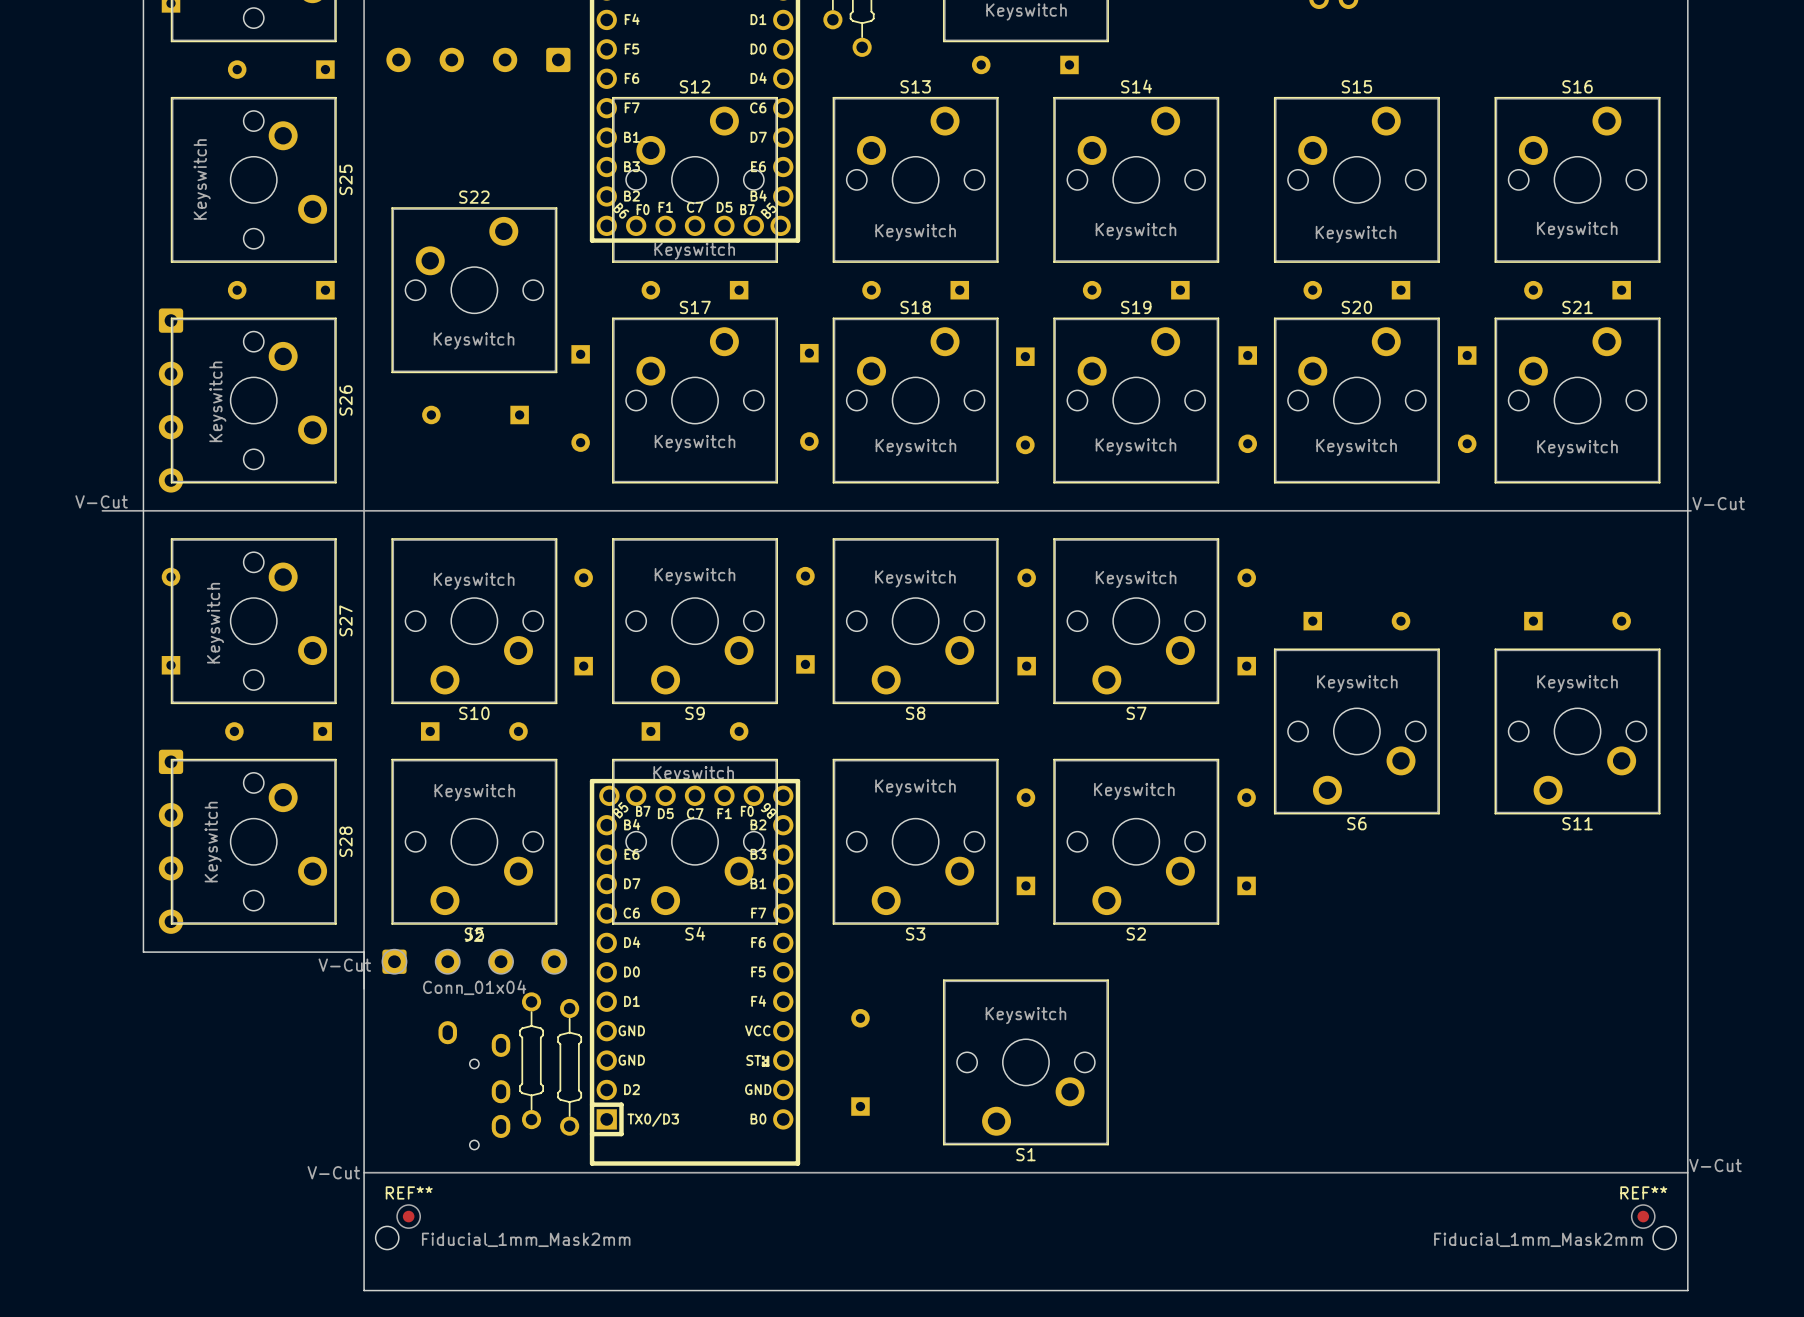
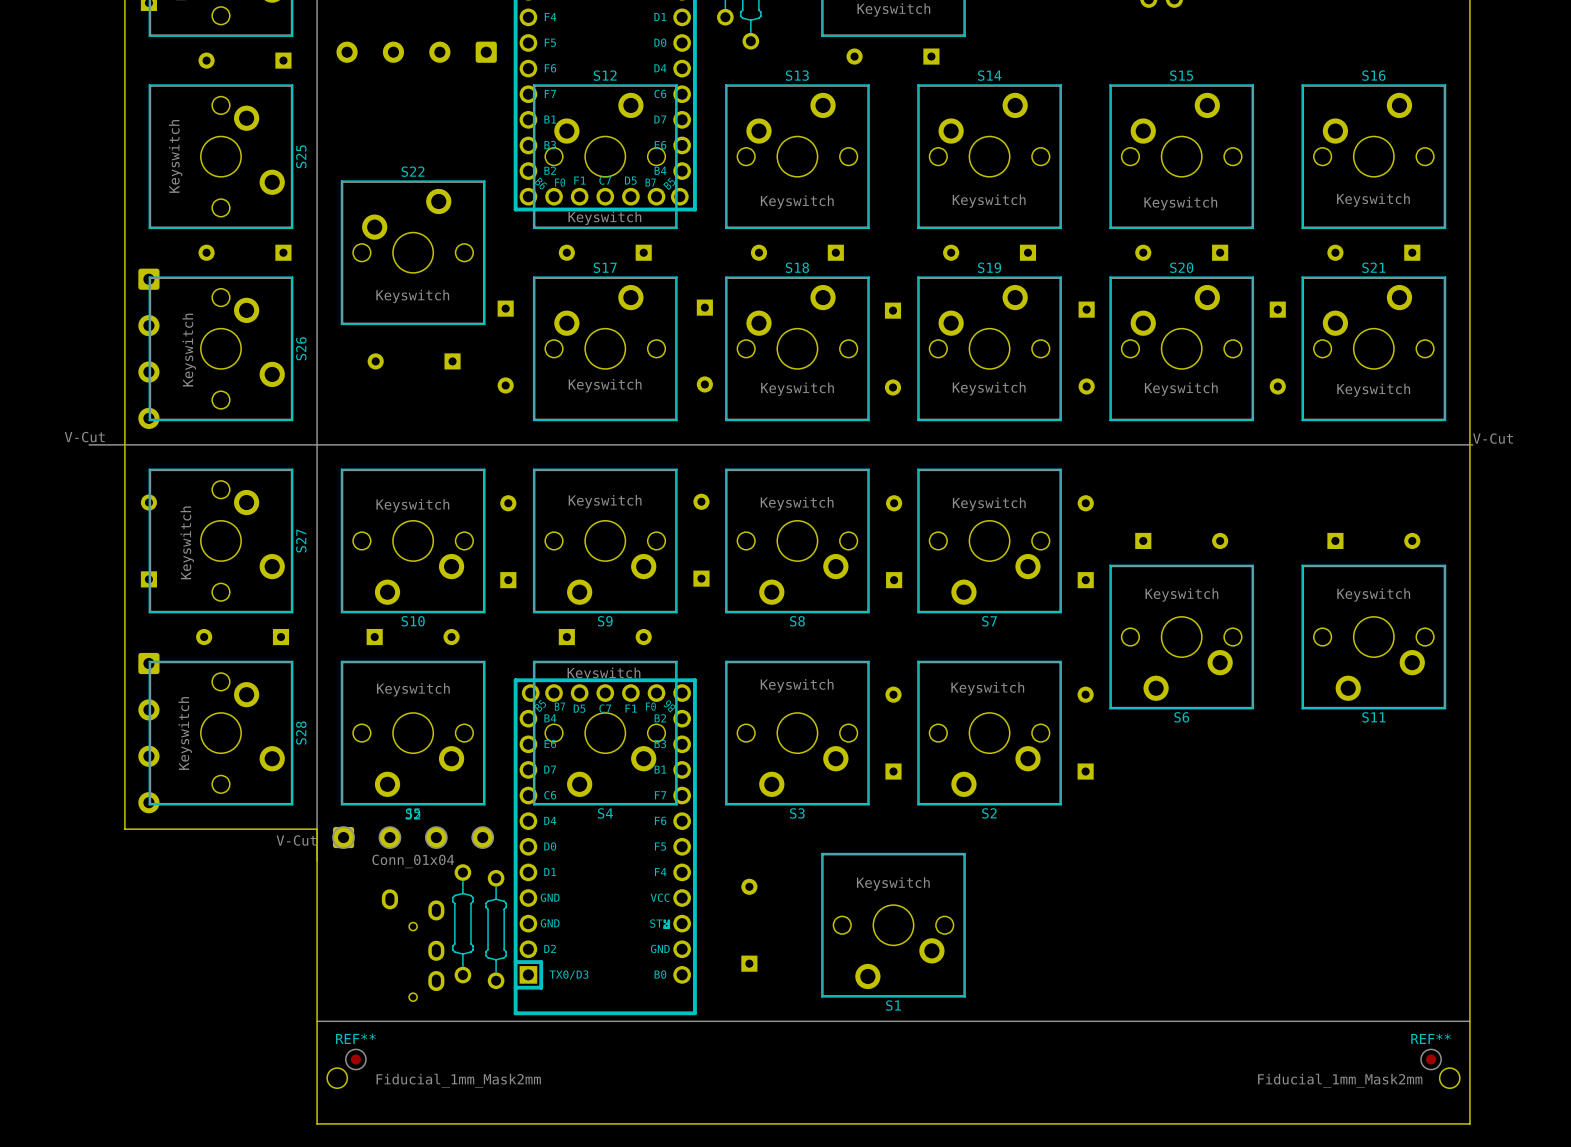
text: V-Cut (1715, 1165) -> none
text: V-Cut (333, 1172) -> none

